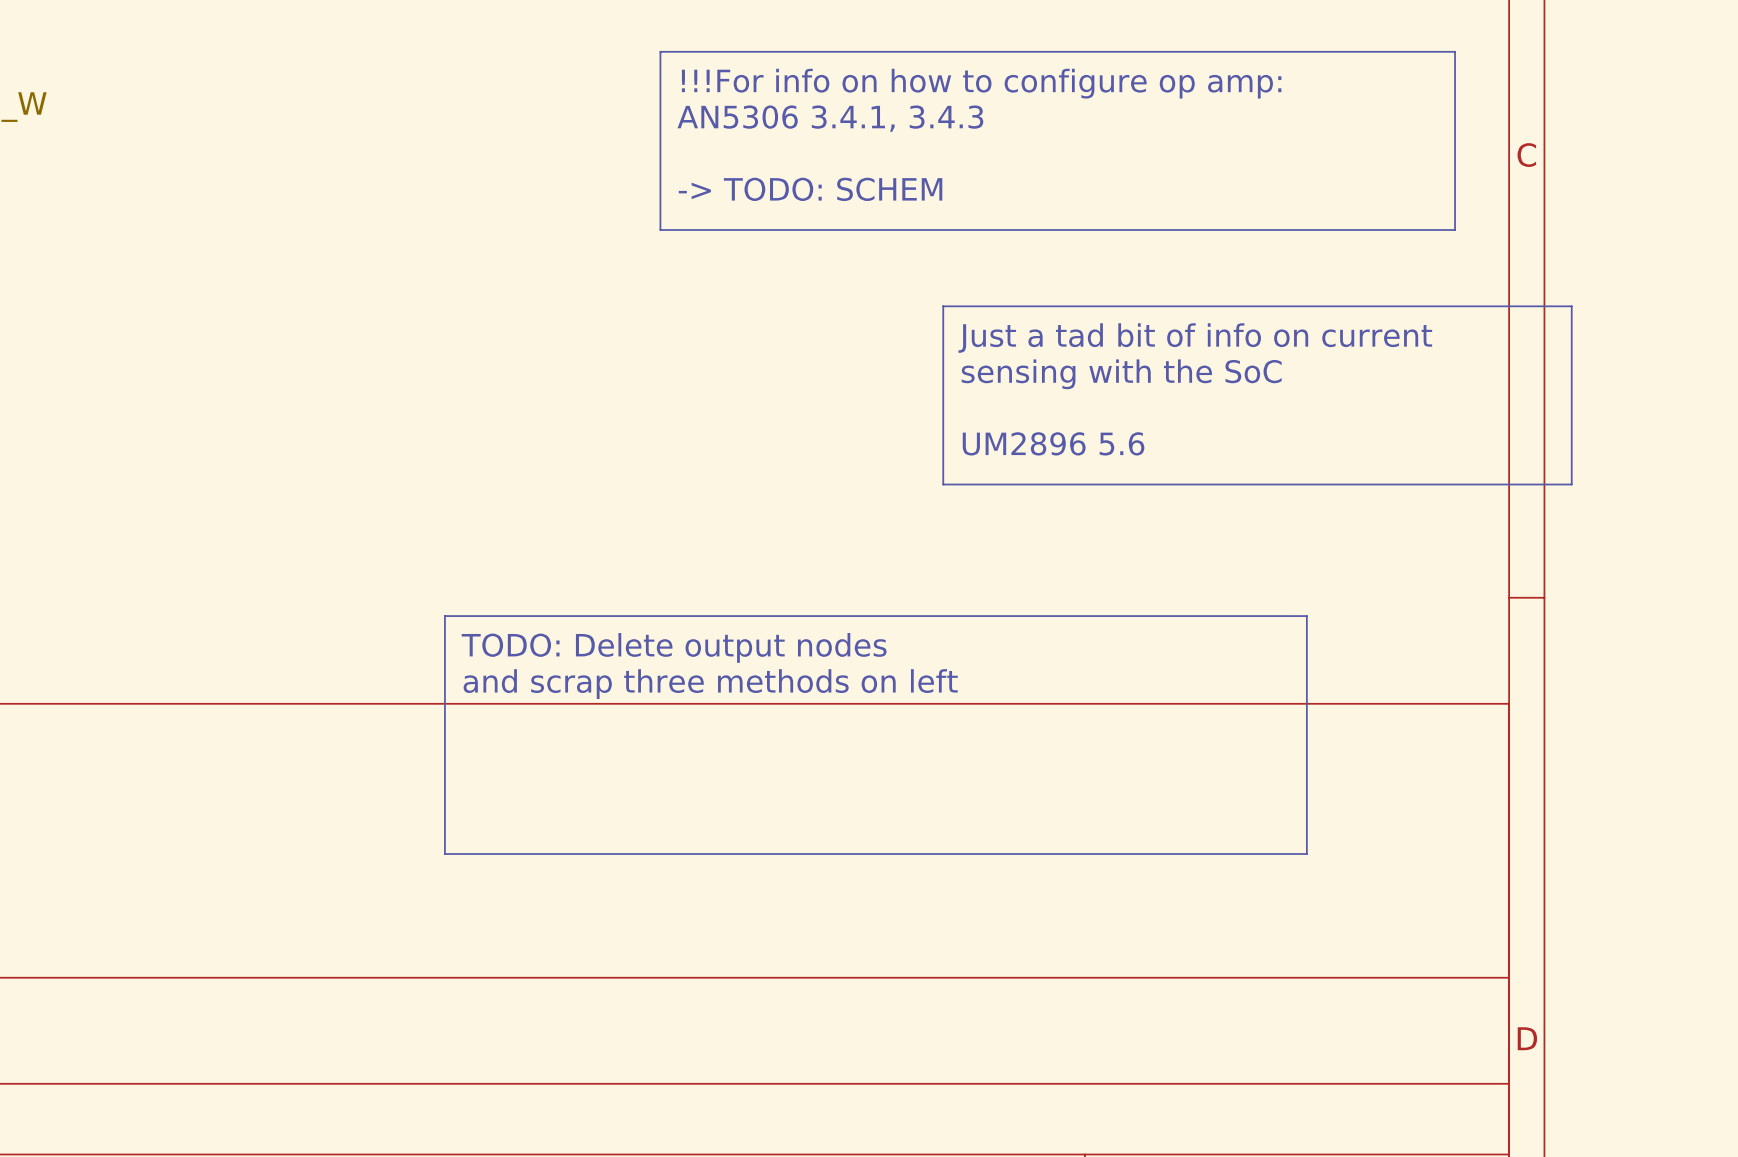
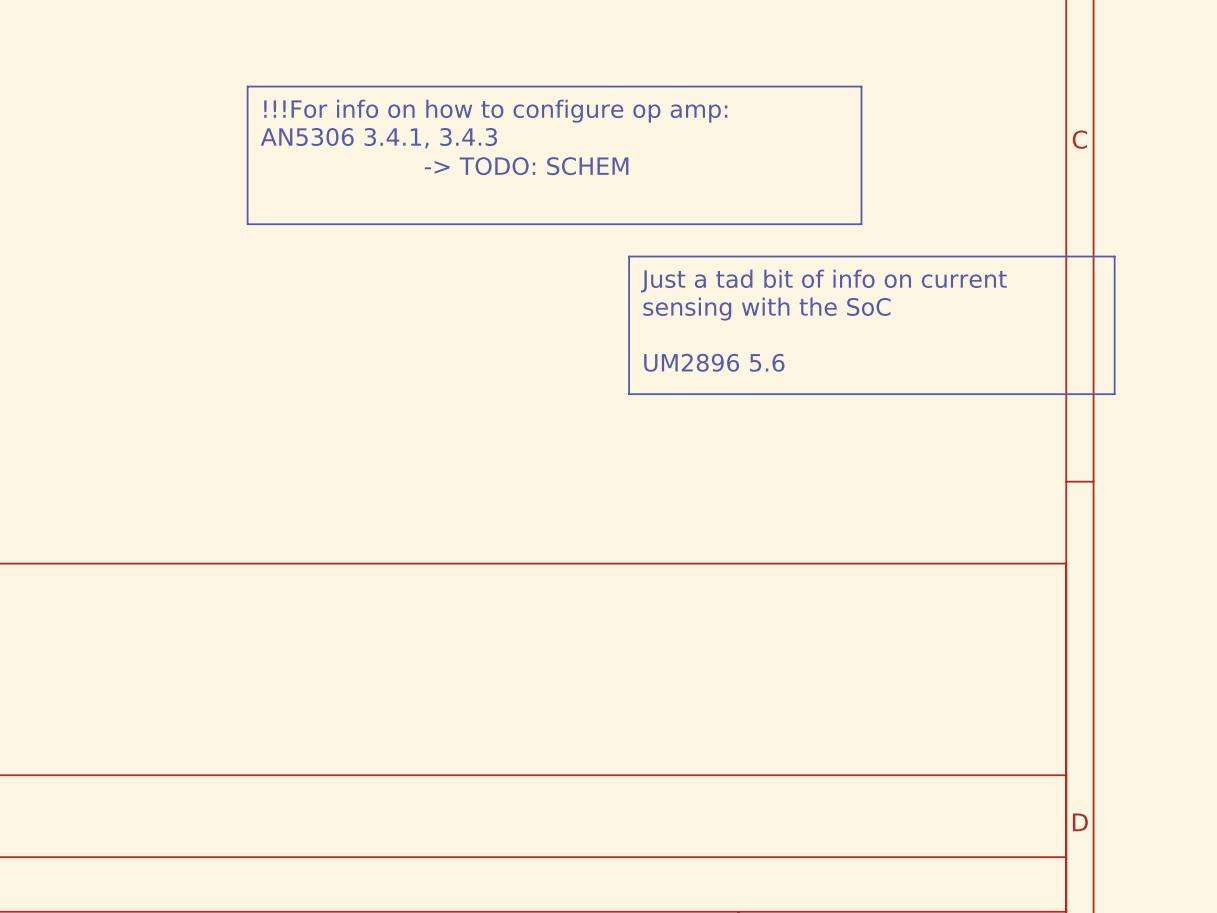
line: (660, 51) (1455, 51) (1455, 230) (660, 230) (660, 51) -> (247, 86) (861, 86) (861, 224) (247, 224) (247, 86)
text position: !!!For info on how to configure op amp: (981, 83) -> !!!For info on how to configure op amp: (495, 111)
text position: AN5306 3.4.1, 3.4.3 (830, 118) -> AN5306 3.4.1, 3.4.3 (378, 138)
line: (444, 616) (1306, 616) (1306, 854) (444, 854) (444, 616) -> none
text: TODO: Delete output nodes (674, 647) -> none
text: and scrap three methods on left (710, 684) -> none

